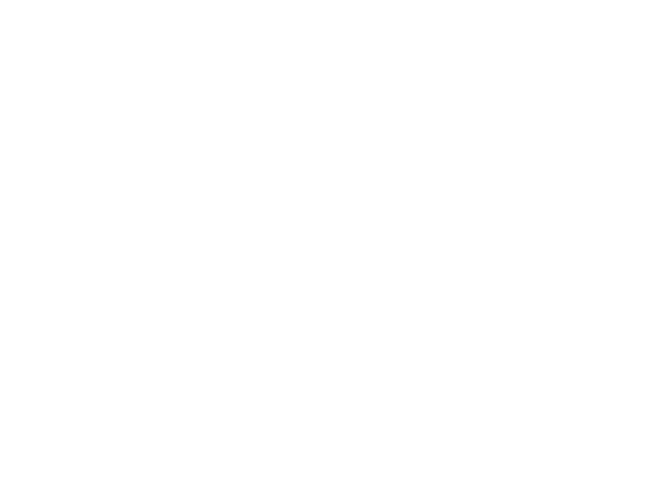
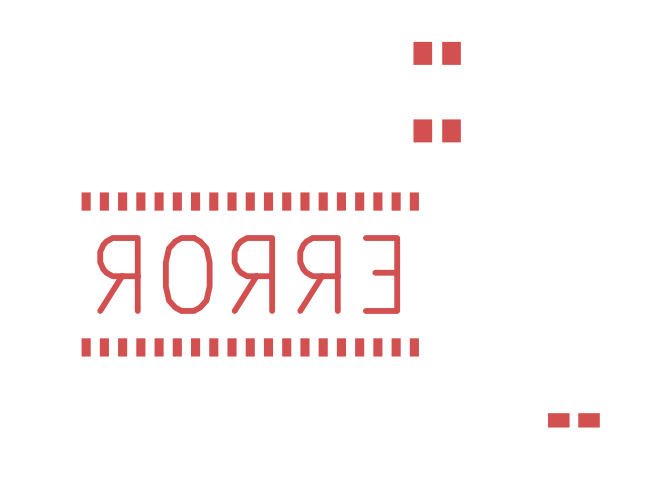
part: none -> (437, 53)
part: none -> (437, 130)
part: none -> (250, 274)
part: none -> (573, 420)

